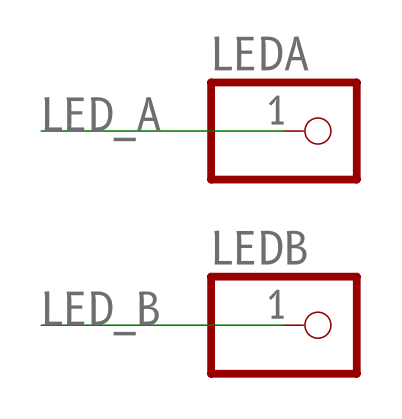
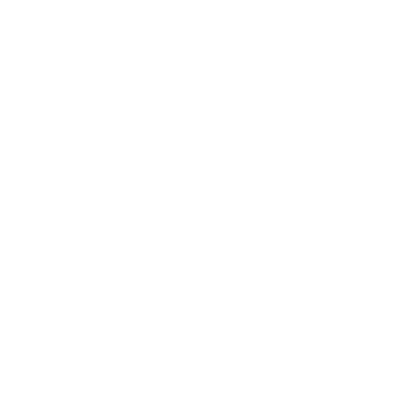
label: LED_A (102, 119) -> none
wire: (41, 131) (283, 131) -> none
LEDA: (283, 131) -> none
label: LED_B (101, 313) -> none
wire: (41, 325) (283, 325) -> none
LEDB: (283, 325) -> none

